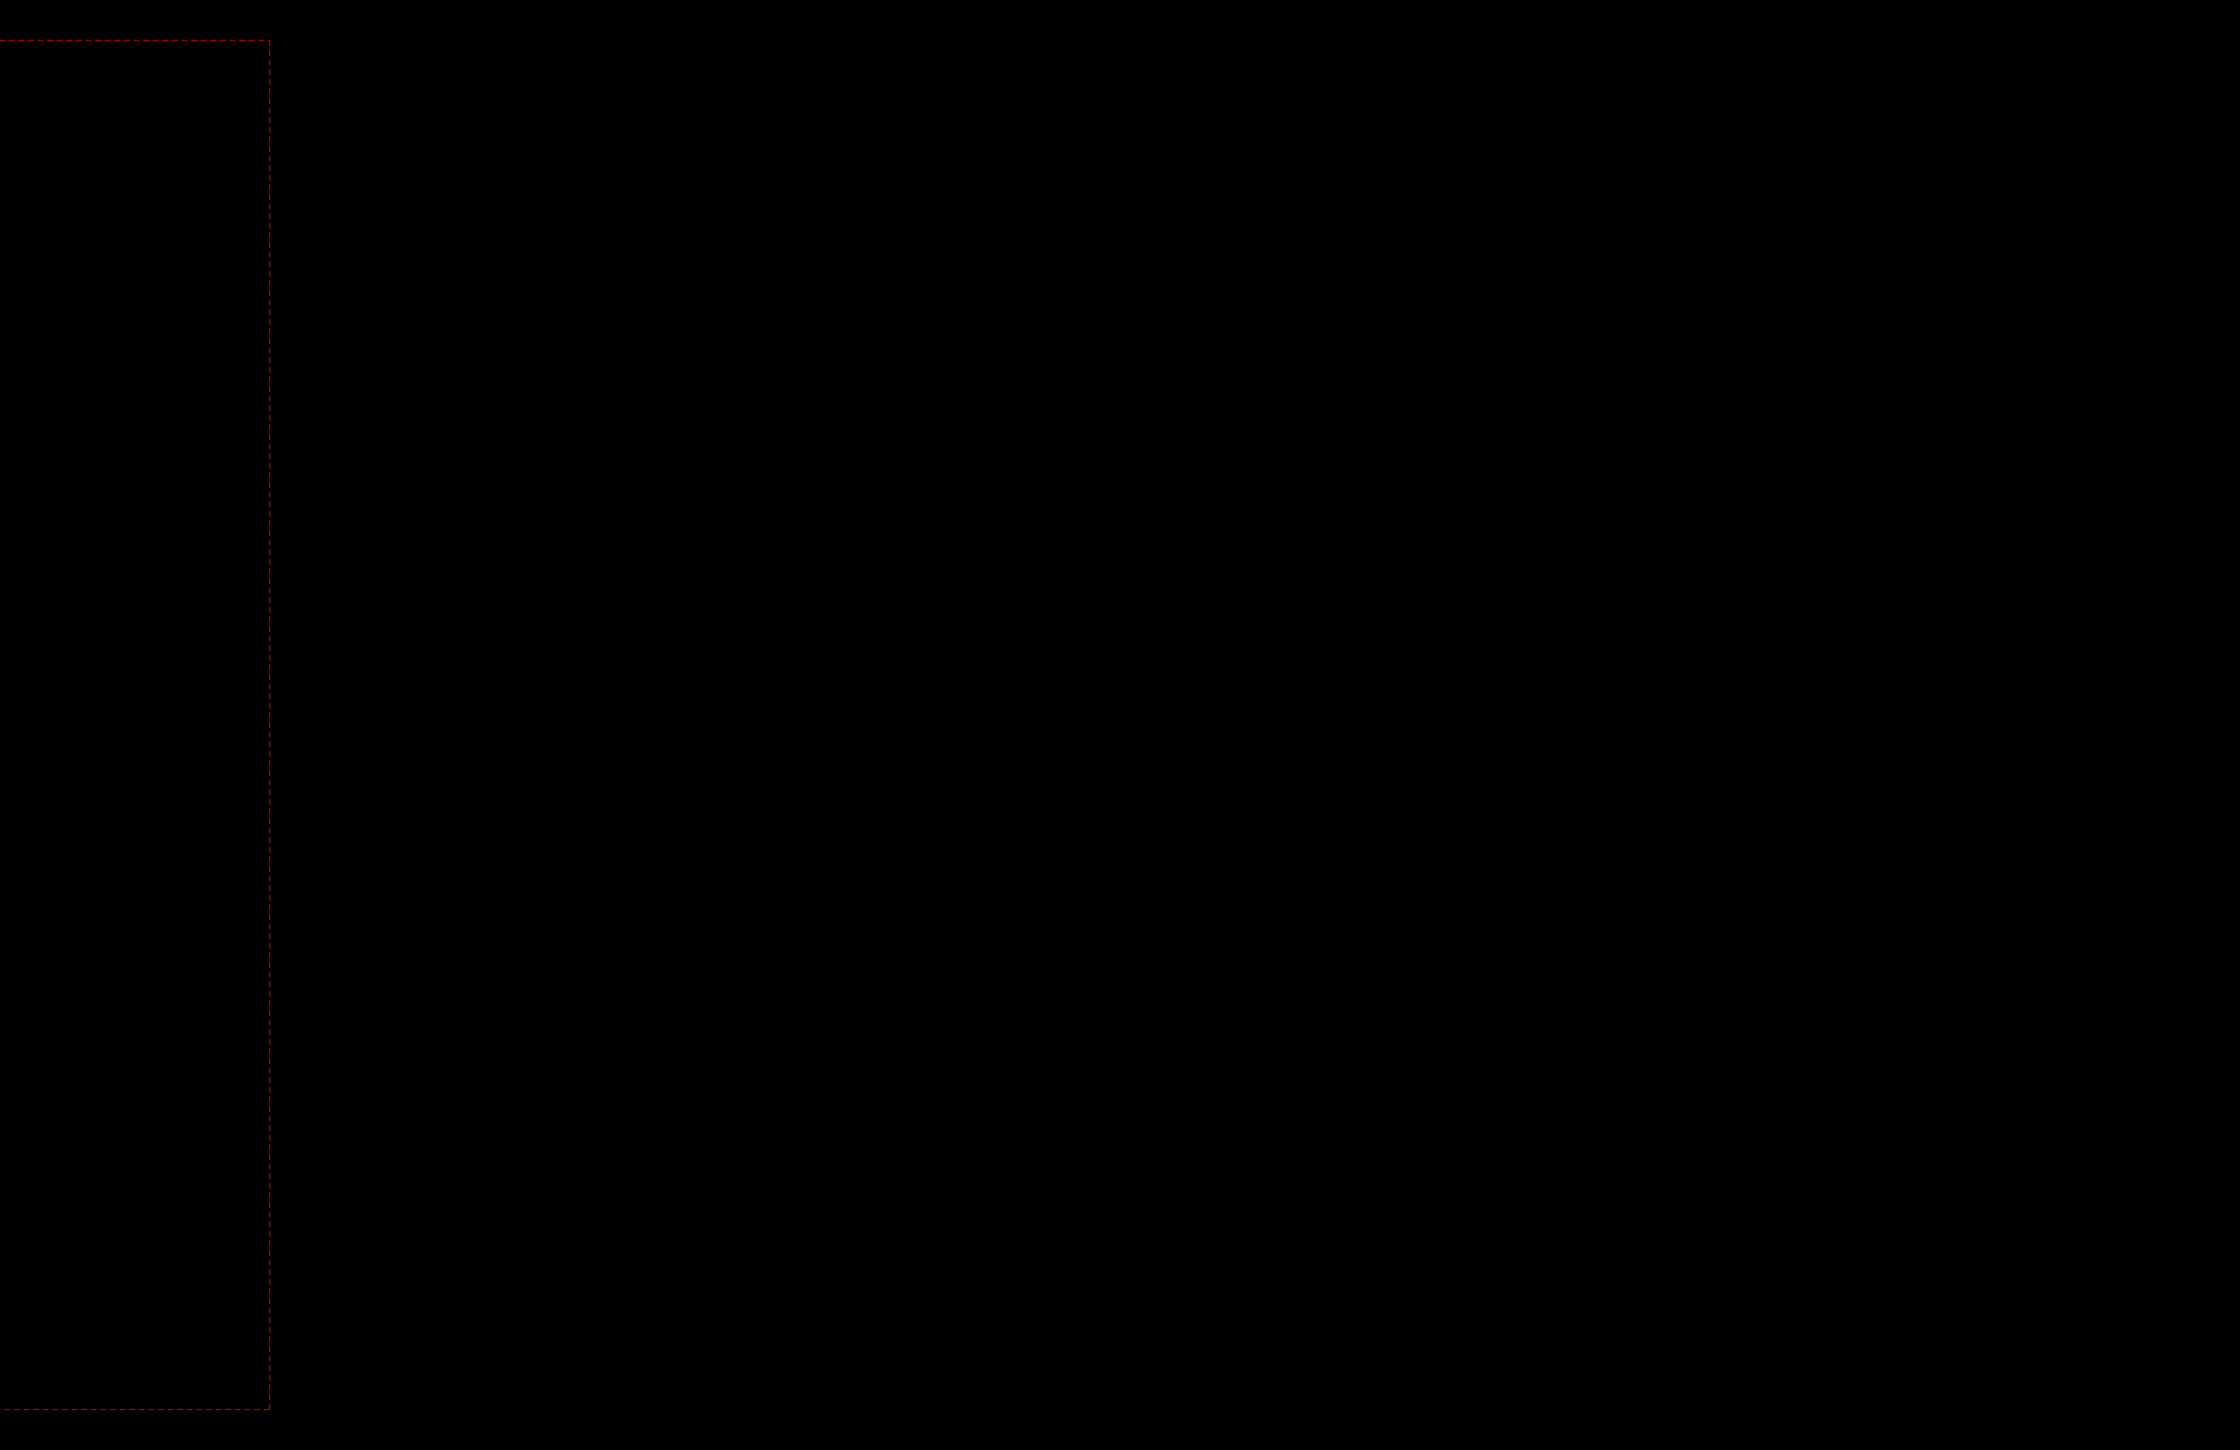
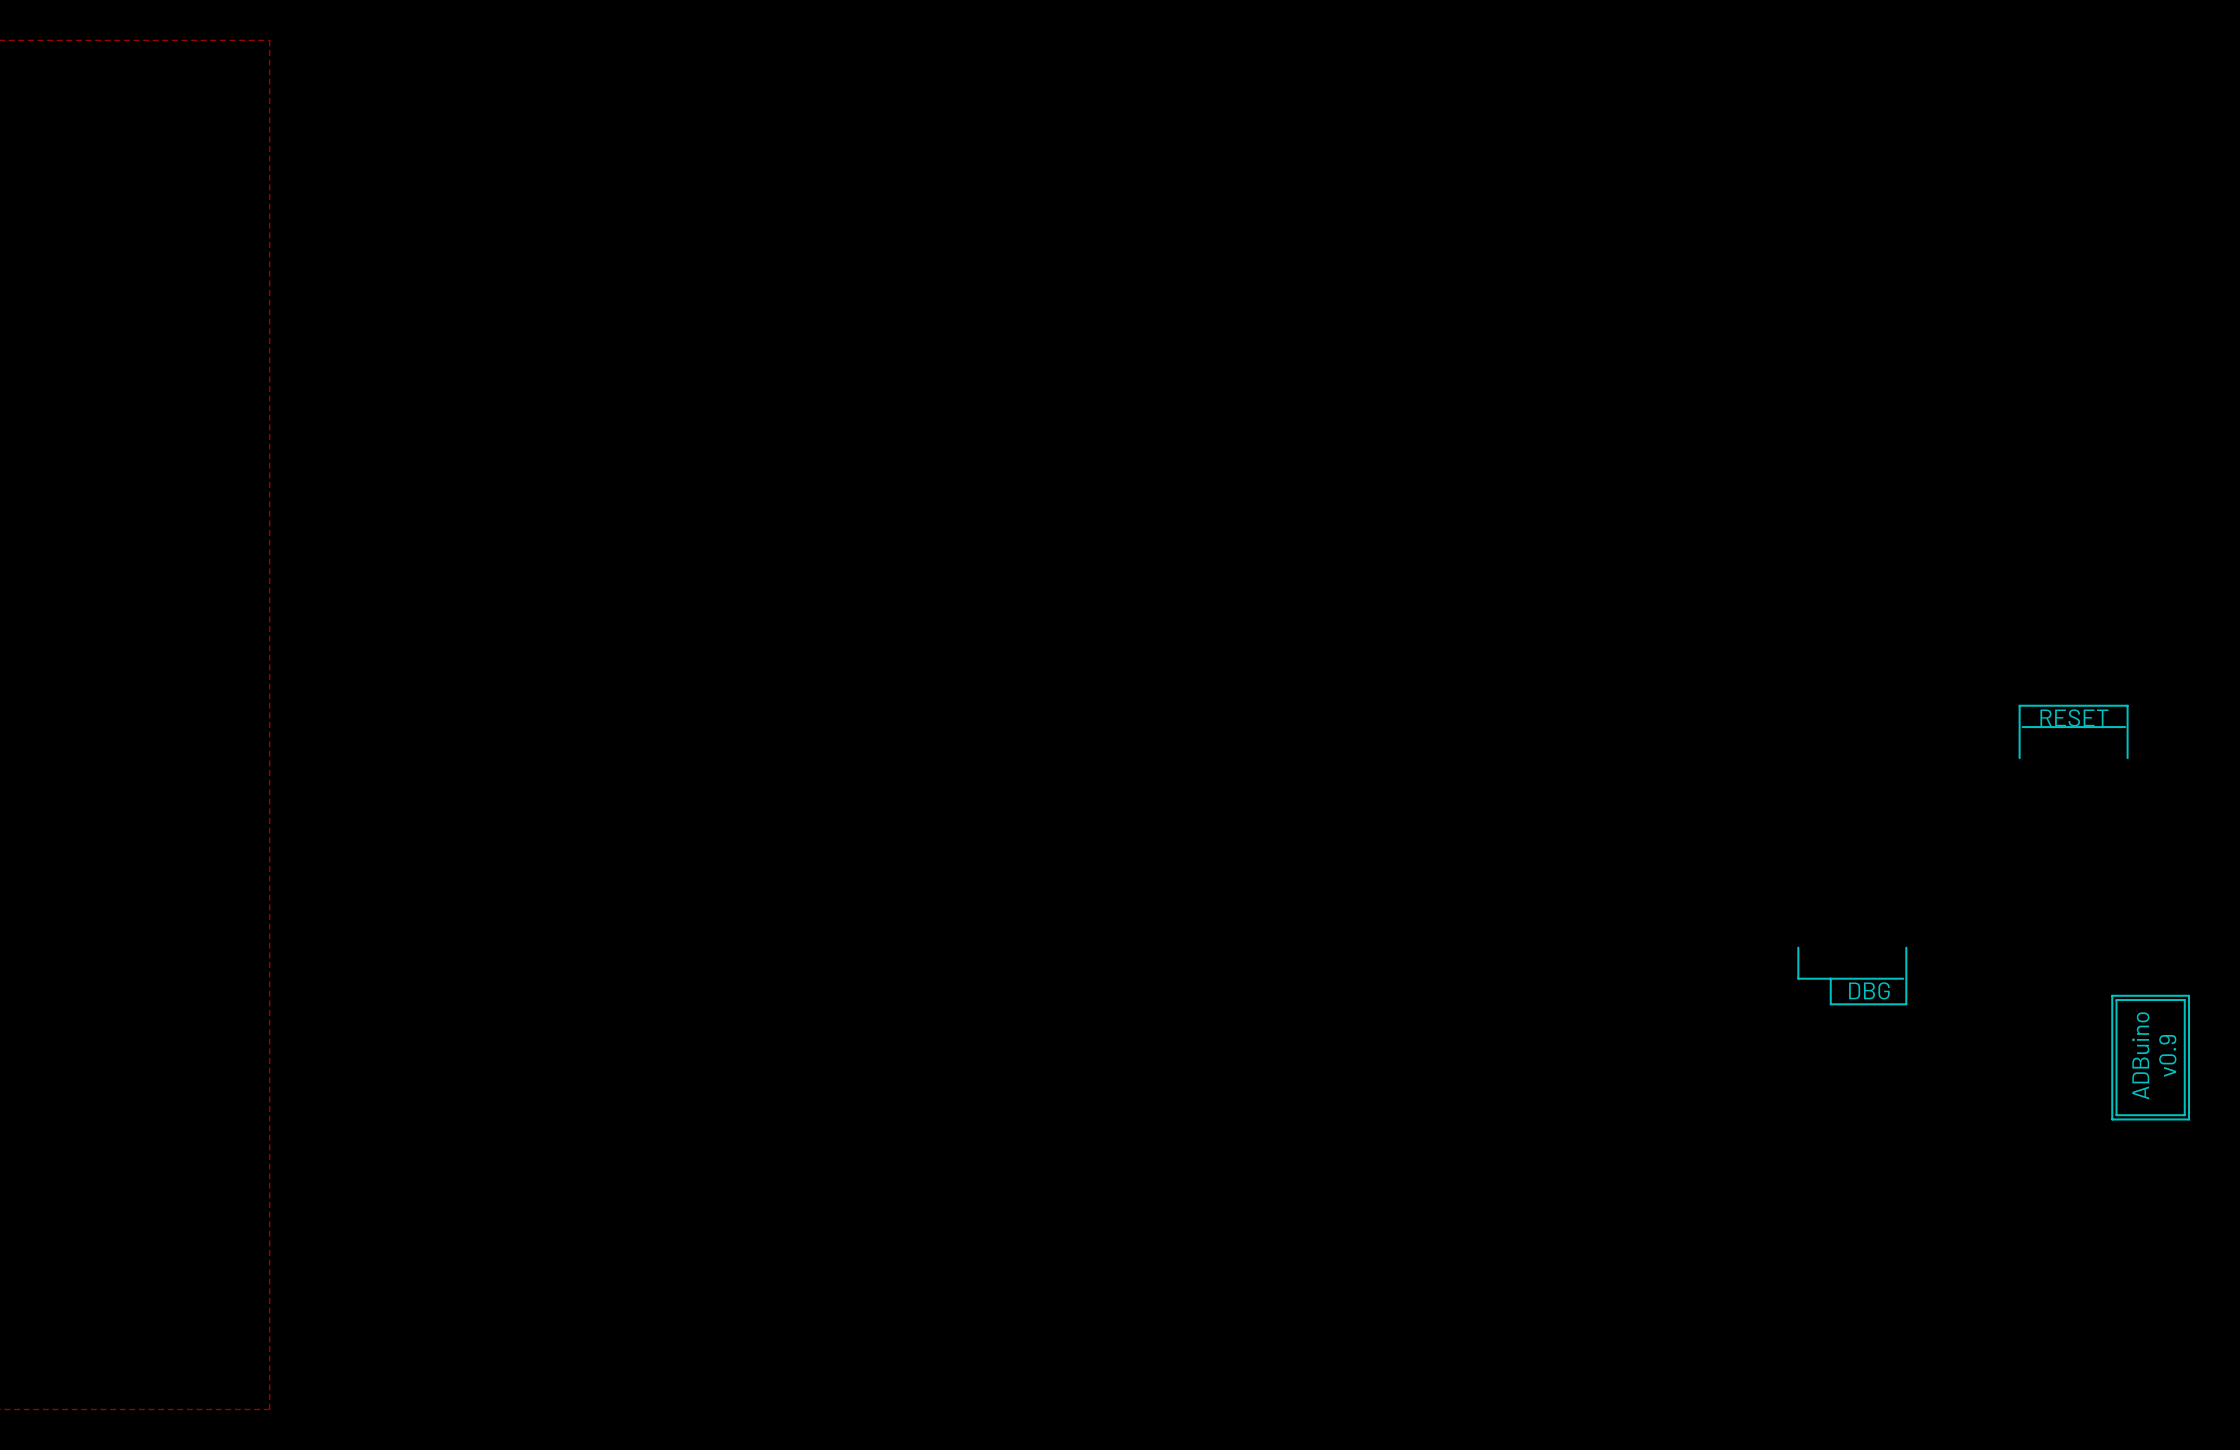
text: none -> RESET (2074, 717)
line: none -> (2022, 727) (2125, 727)
line: none -> (2019, 758) (2019, 705) (2127, 705) (2127, 758)
line: none -> (1798, 947) (1798, 978) (1903, 978)
line: none -> (1906, 947) (1906, 1004) (1830, 1004) (1830, 978)
text: none -> DBG (1869, 990)
line: none -> (2112, 995) (2112, 1119) (2189, 1119) (2189, 995) (2112, 995)
line: none -> (2116, 1000) (2184, 1000) (2184, 1115) (2116, 1115) (2116, 1000)
text: none -> ADBuino (2140, 1055)
text: none -> v0.9 (2167, 1055)

